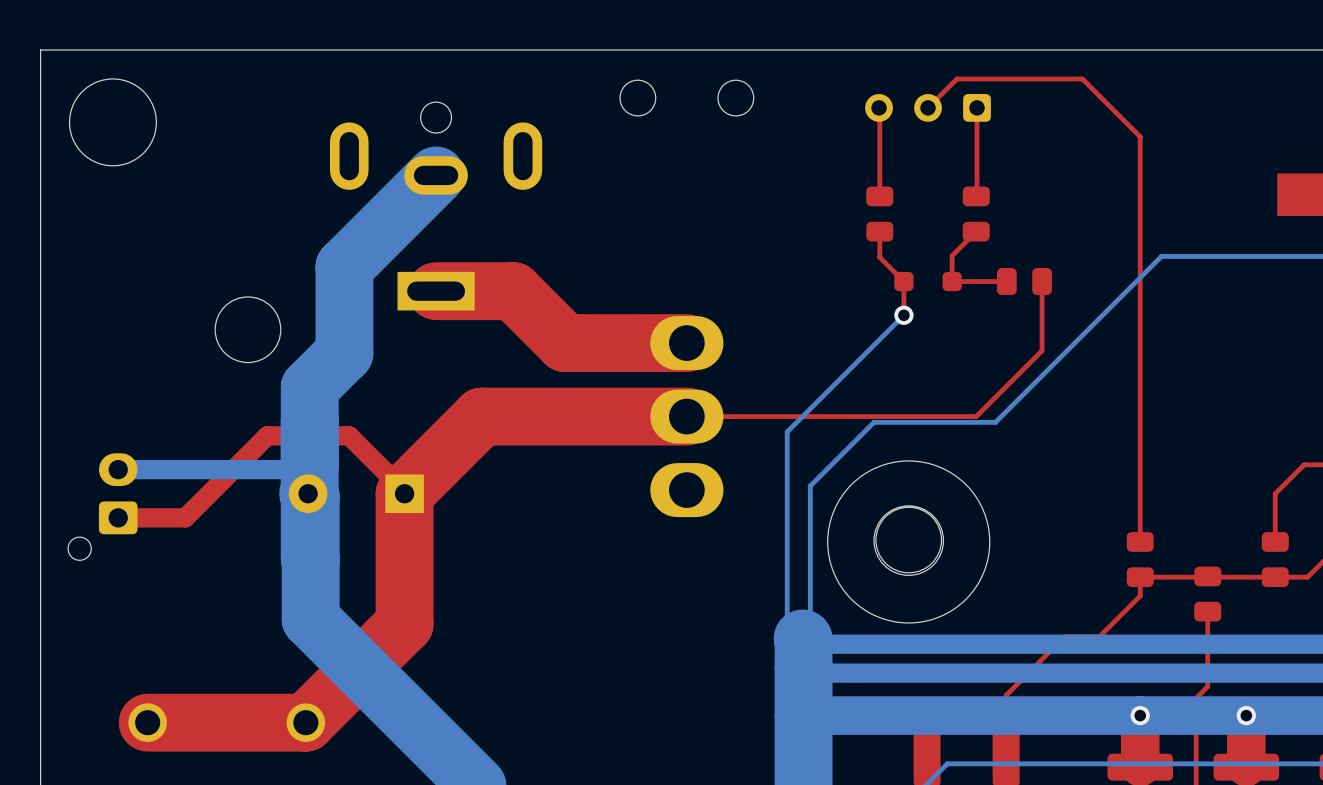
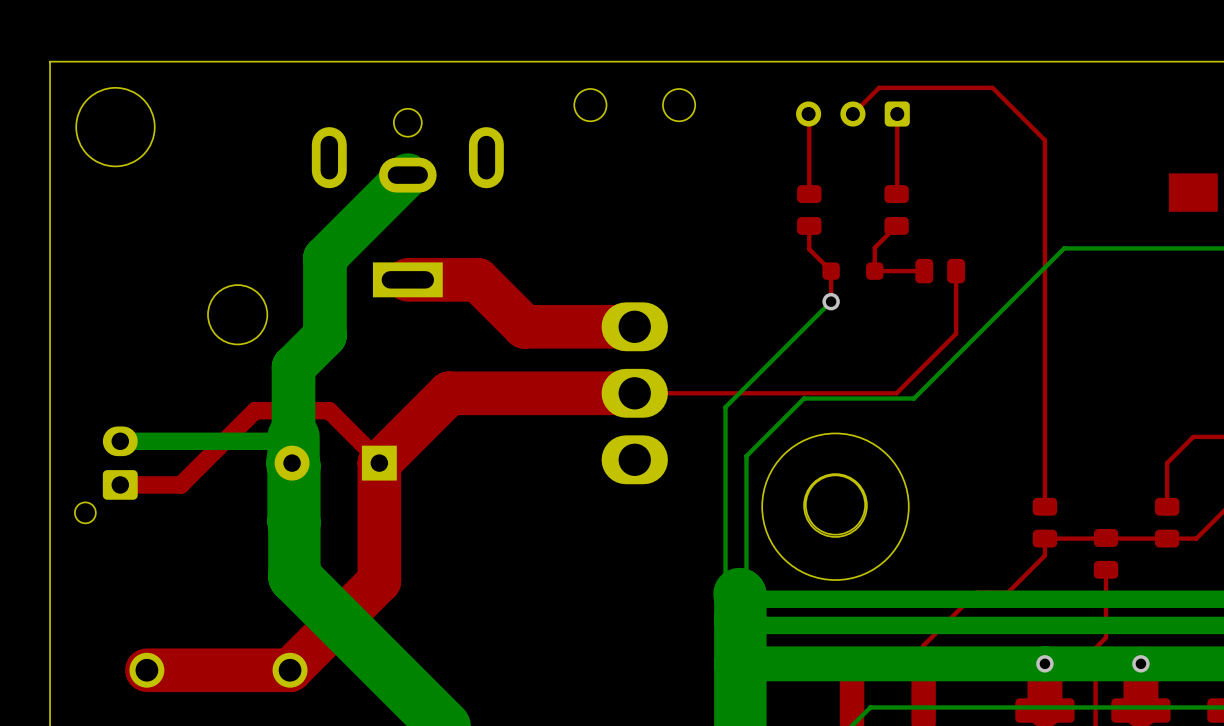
bottom track width: thick (436, 175) (344, 267) (344, 352) (309, 387) (309, 464) -> thin (407, 175) (324, 258) (324, 335) (293, 367) (293, 436)
top track width: thick (436, 291) (513, 291) (565, 343) (686, 343) -> thin (407, 279) (477, 279) (524, 326) (634, 326)
top track width: thick (686, 416) (481, 416) (404, 493) (404, 623) (305, 722) (147, 722) -> thin (634, 393) (449, 393) (379, 463) (379, 580) (290, 670) (146, 670)

